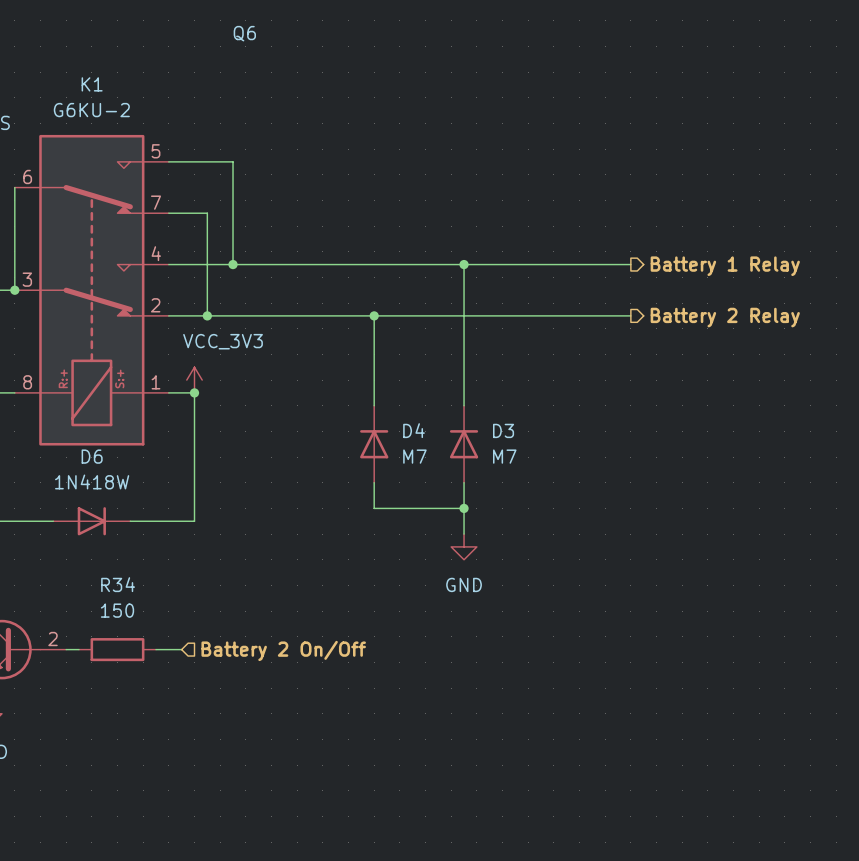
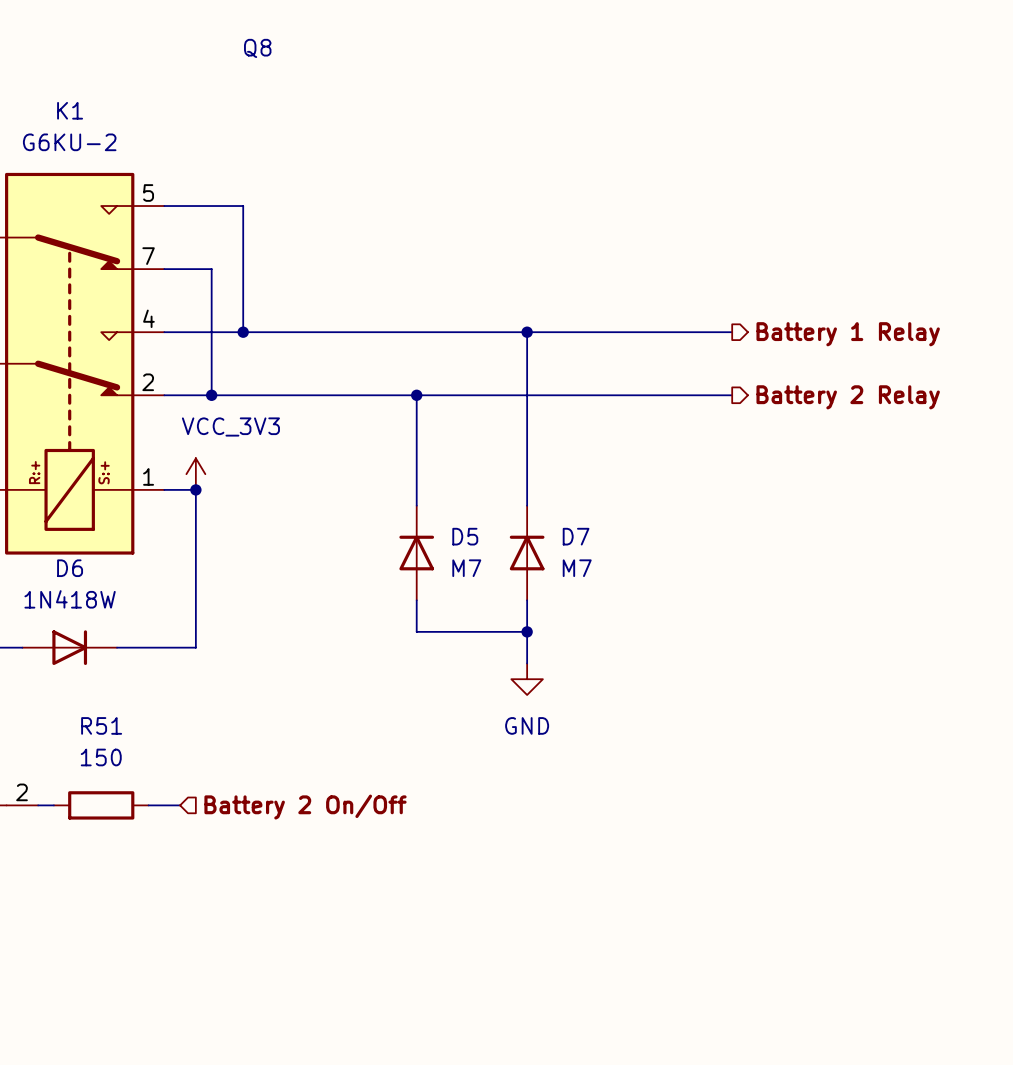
Q6 name: Q6 (244, 33) -> Q8 (257, 48)
D4 name: D4 (414, 430) -> D5 (465, 536)
D3 name: D3 (503, 430) -> D7 (576, 536)
R34 name: R34 (118, 584) -> R51 (101, 725)

